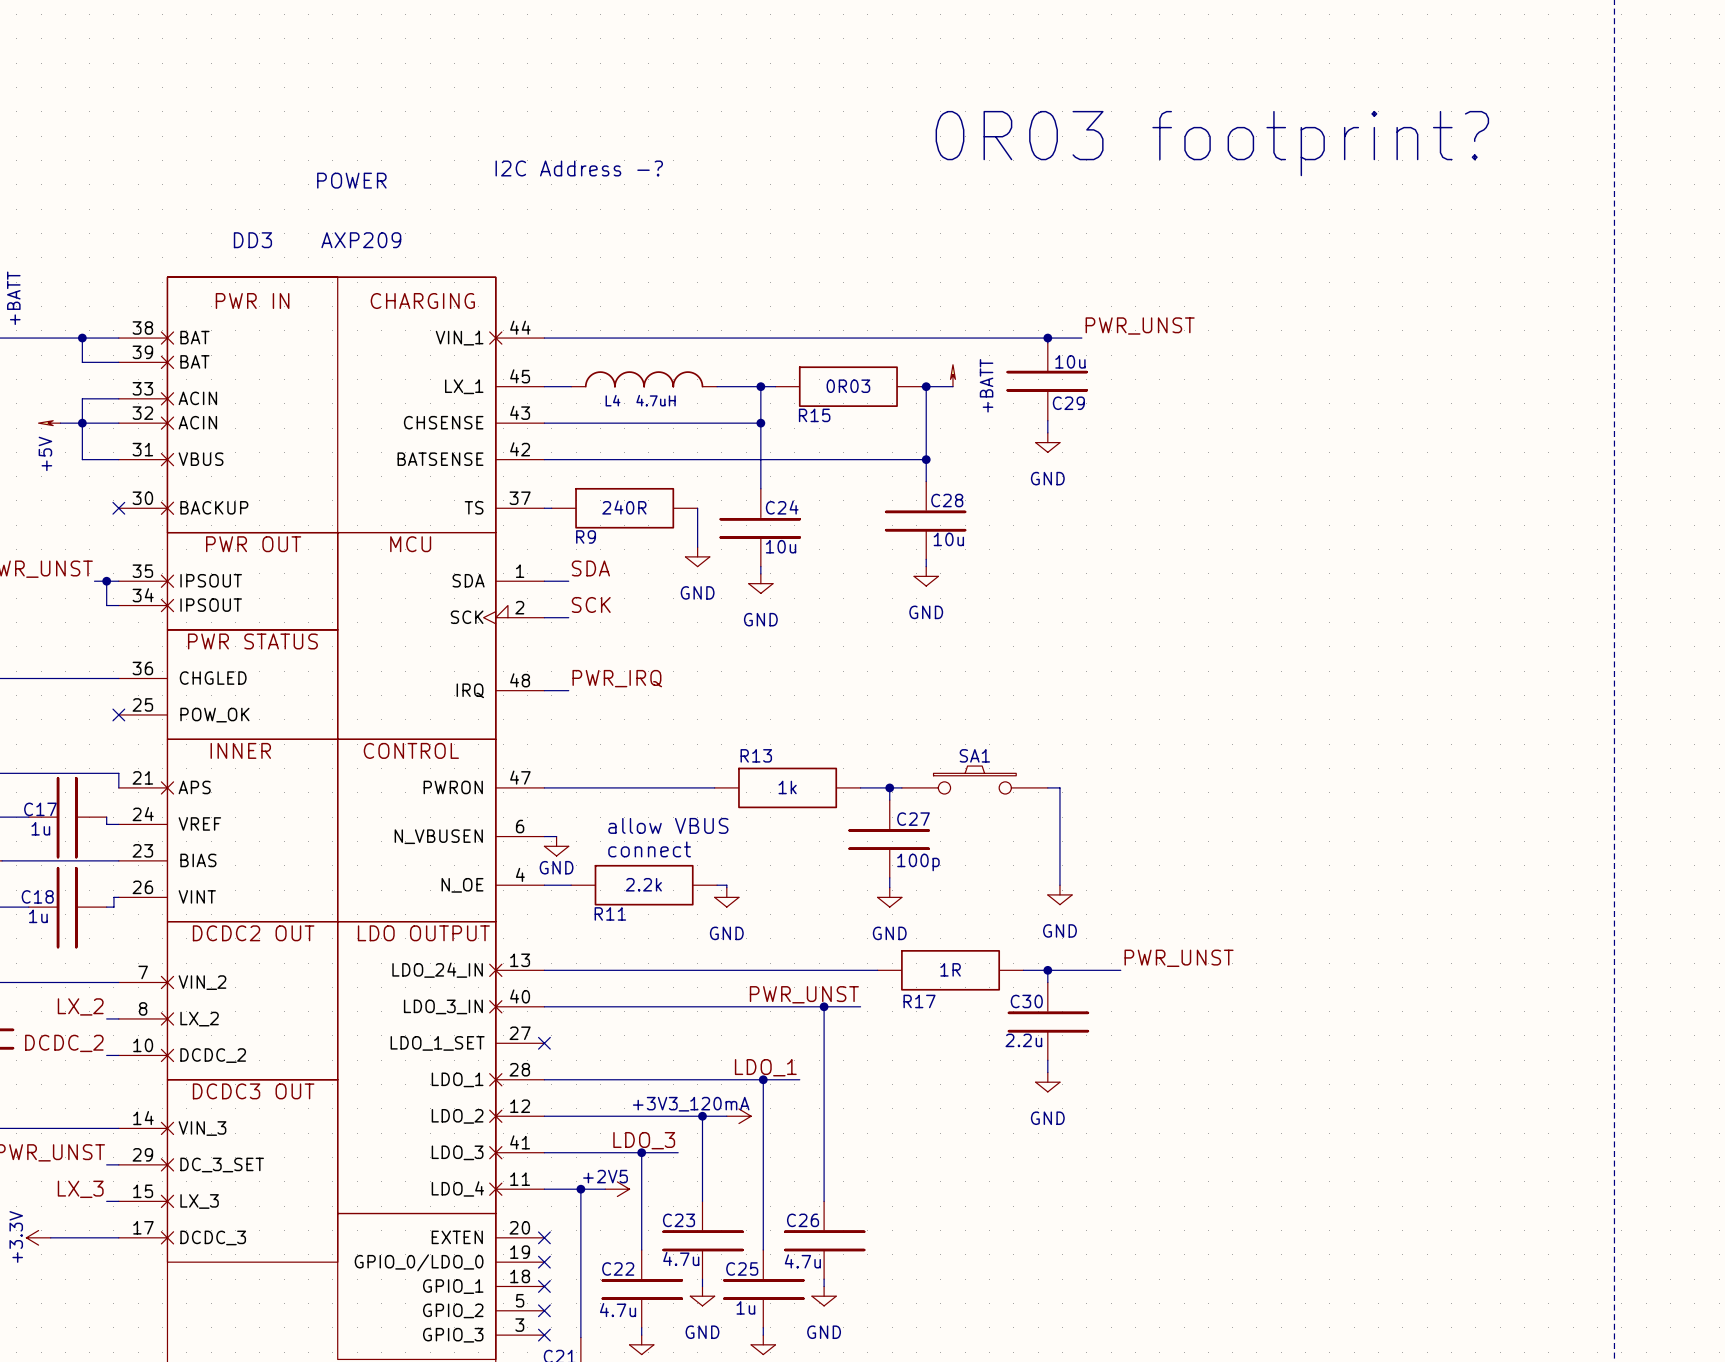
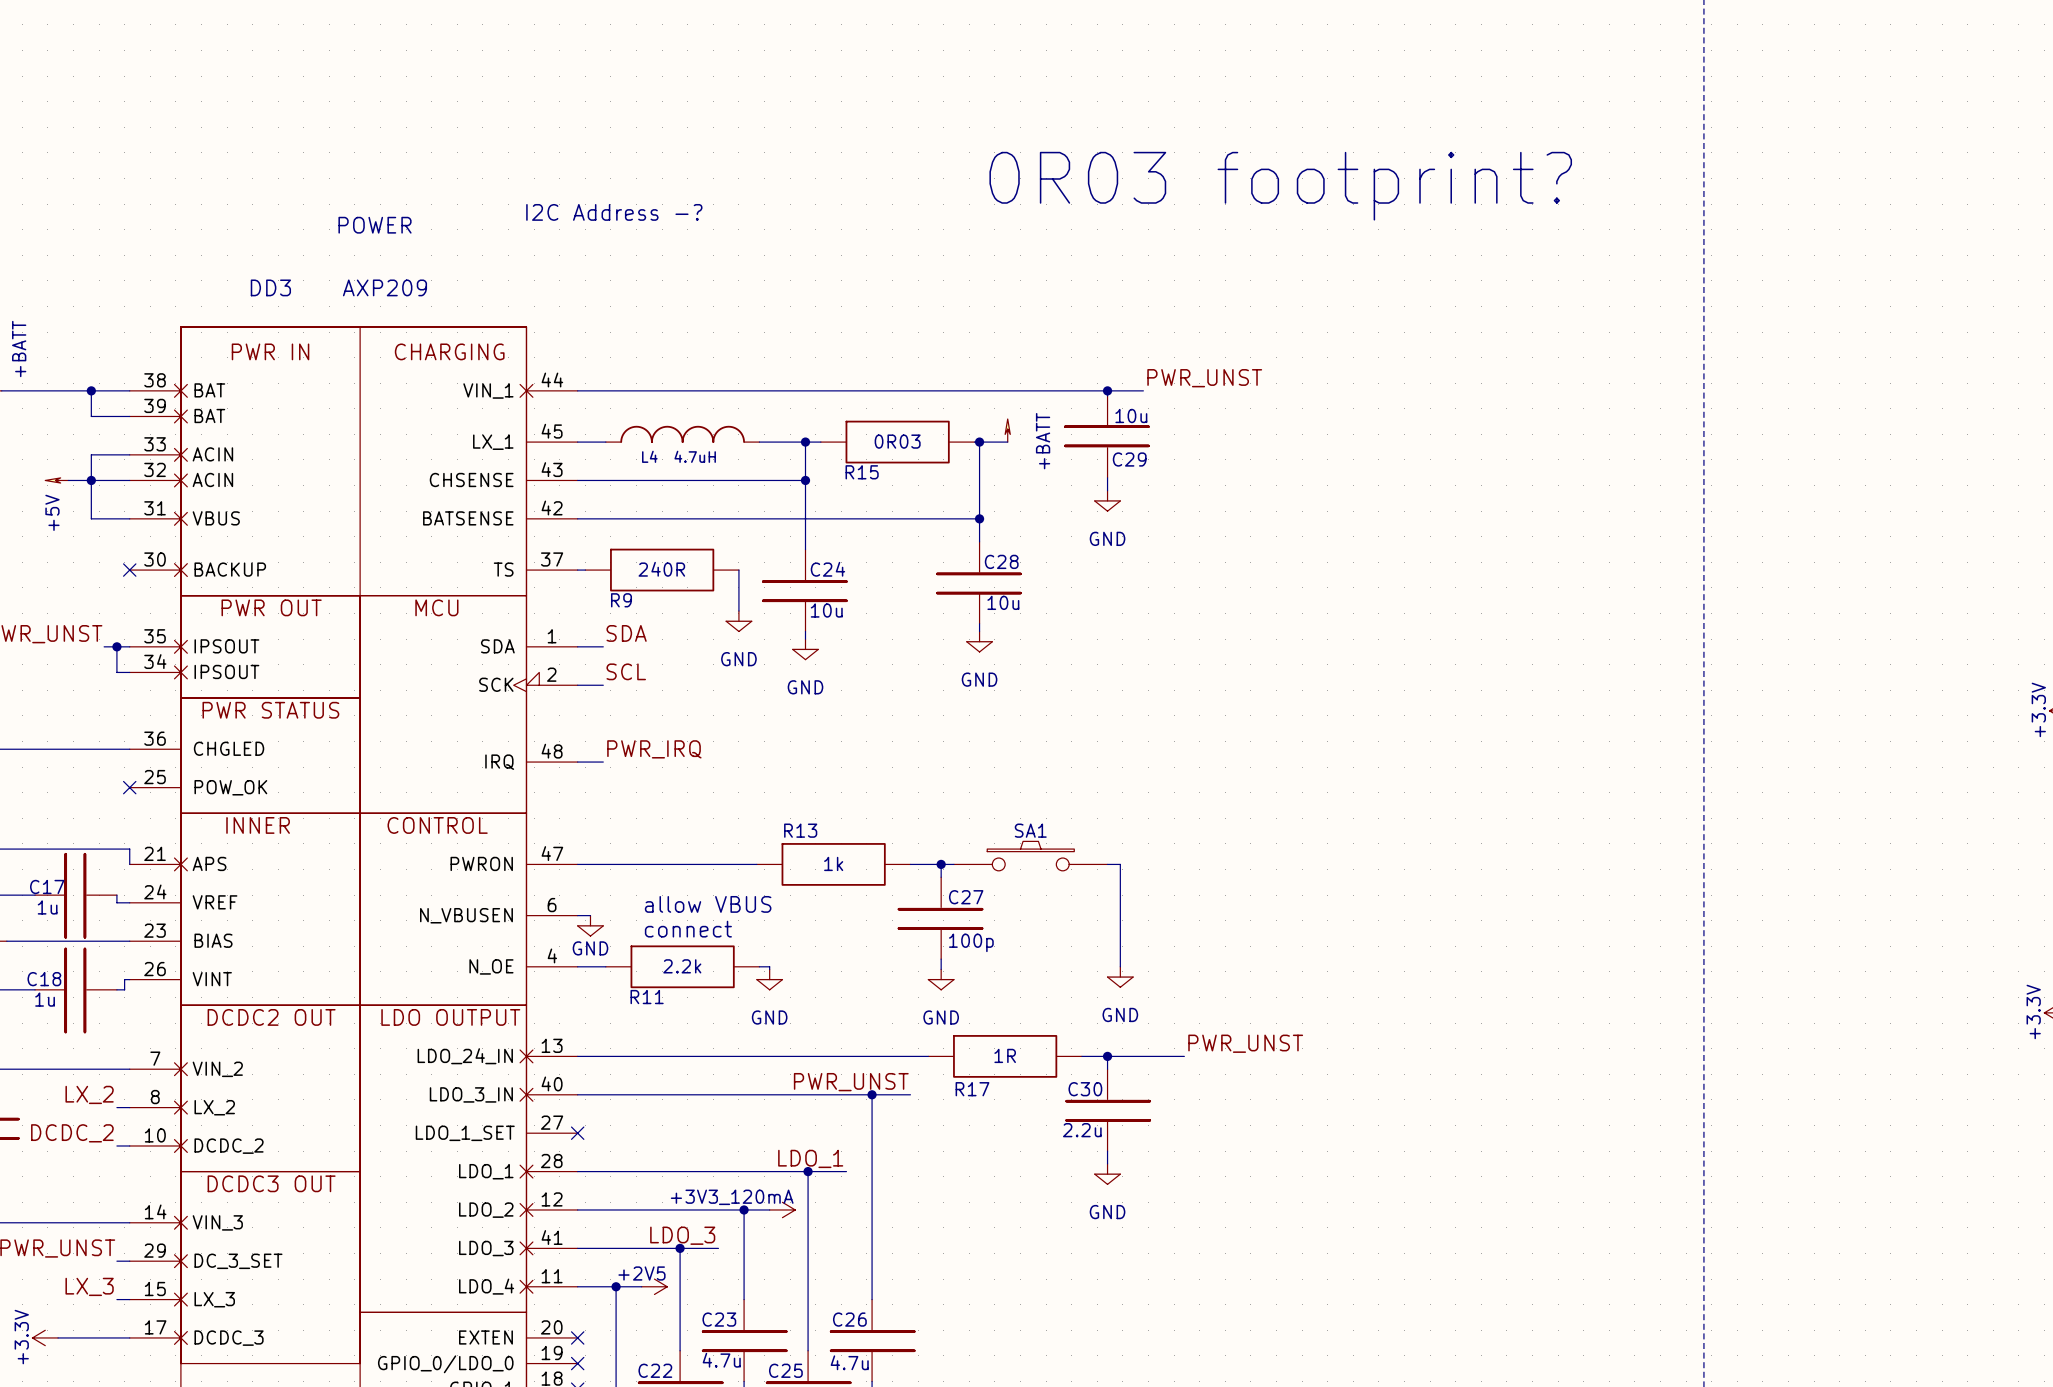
label: SCK (591, 604) -> SCL (626, 671)

